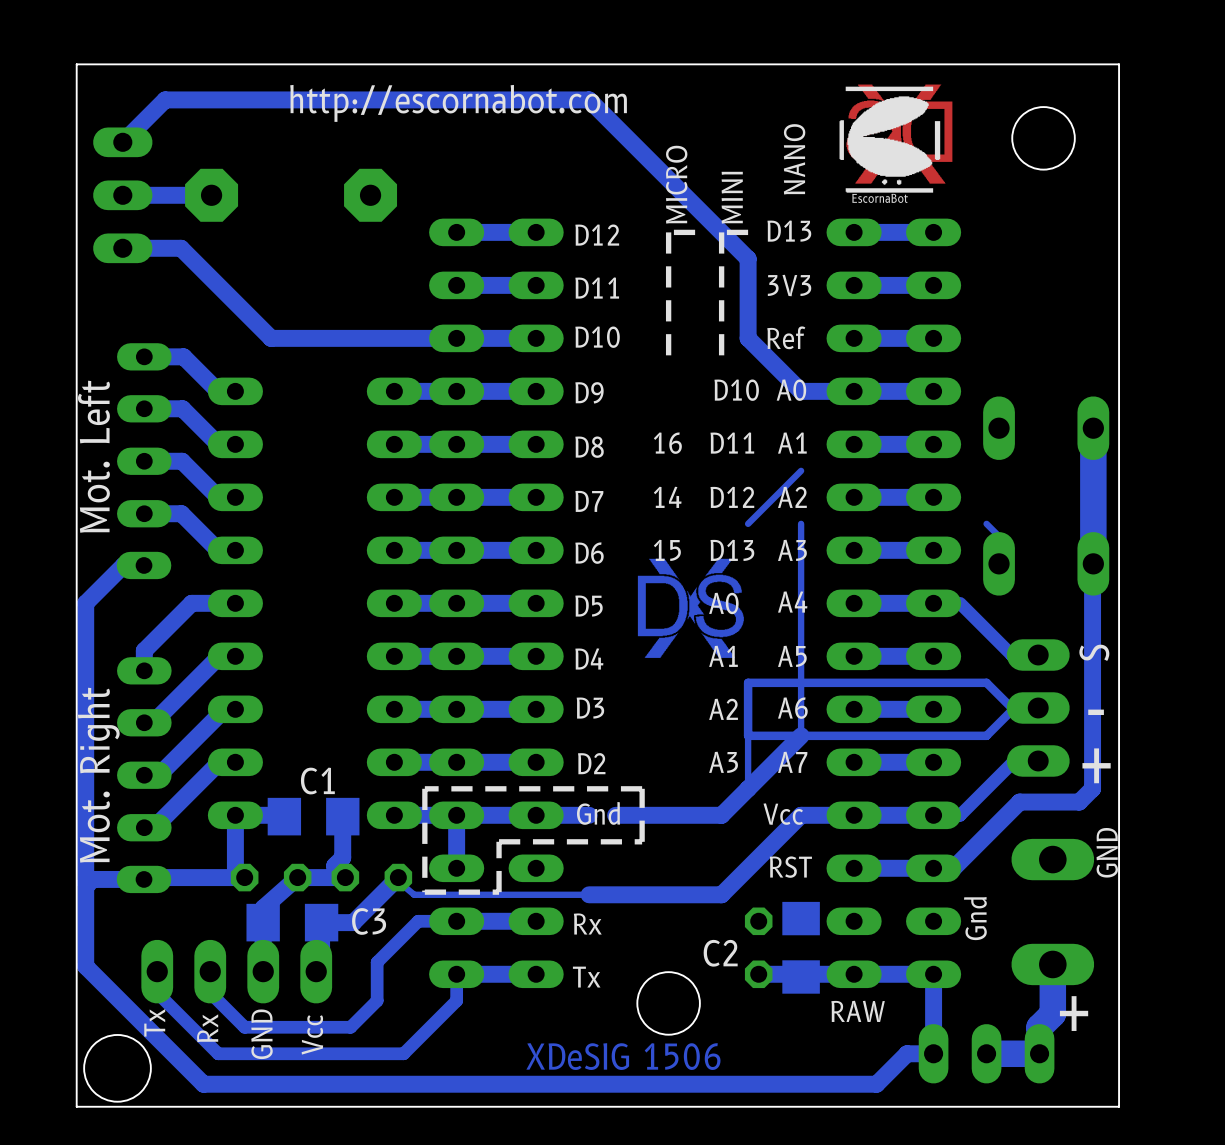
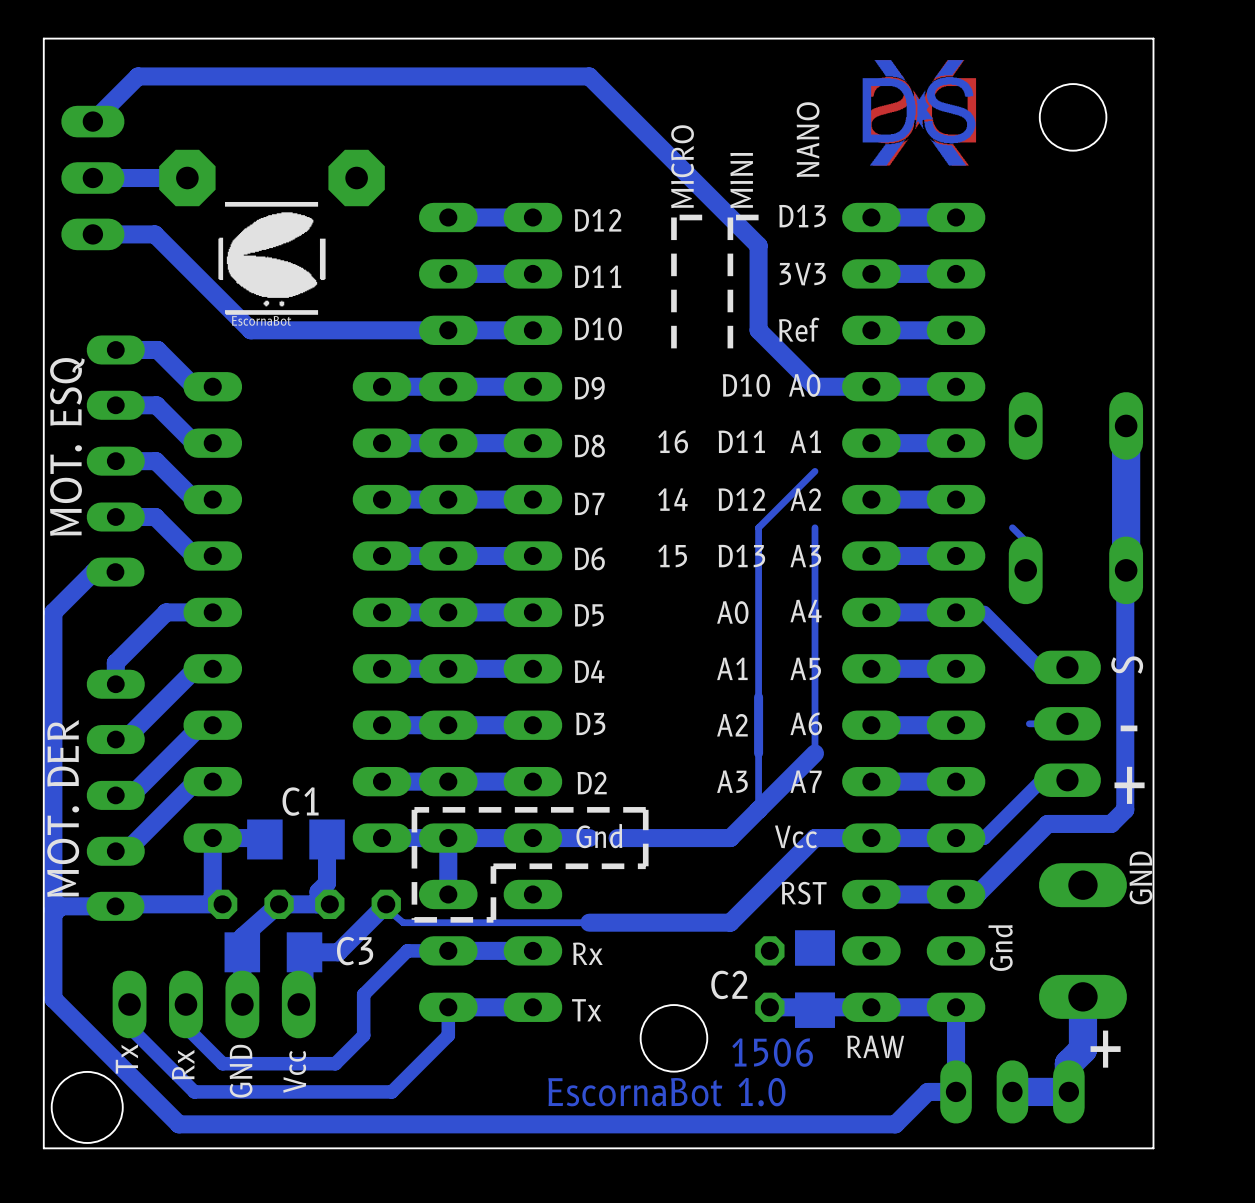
drawing: [839, 86, 941, 193] -> none
text: http://escornabot.com (458, 103) -> none
drawing: none -> [218, 201, 326, 315]
text: Mot. Left (93, 456) -> MOT. ESQ (67, 446)
bottom track: none -> (758, 527) (758, 697)
drawing position: (690, 608) -> (919, 112)
bottom track: (748, 682) (986, 682) (1011, 708) -> (1029, 723) (1039, 723)
bottom track: (1039, 709) (1013, 709) (986, 735) (748, 735) -> none
text: Mot. Right (98, 775) -> MOT. DER (63, 808)
text: none -> 1506 (772, 1052)
text: none -> EscornaBot 1.0 (666, 1092)
text: XDeSIG 1506 (623, 1056) -> none

